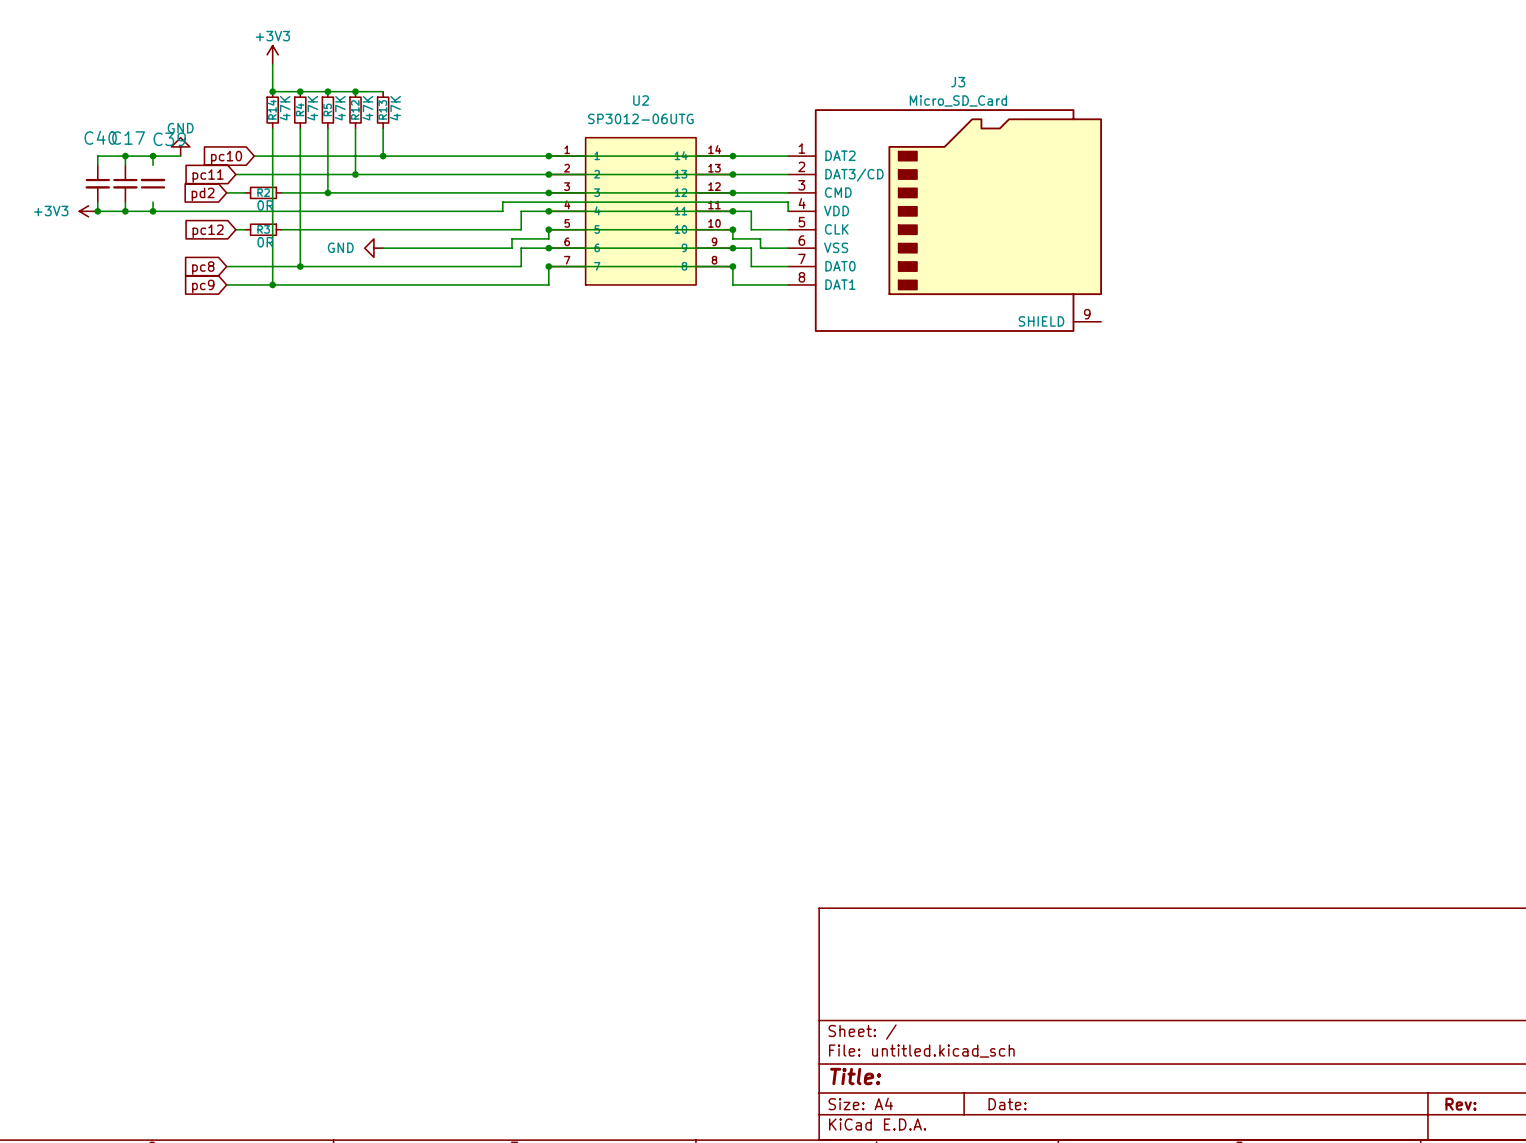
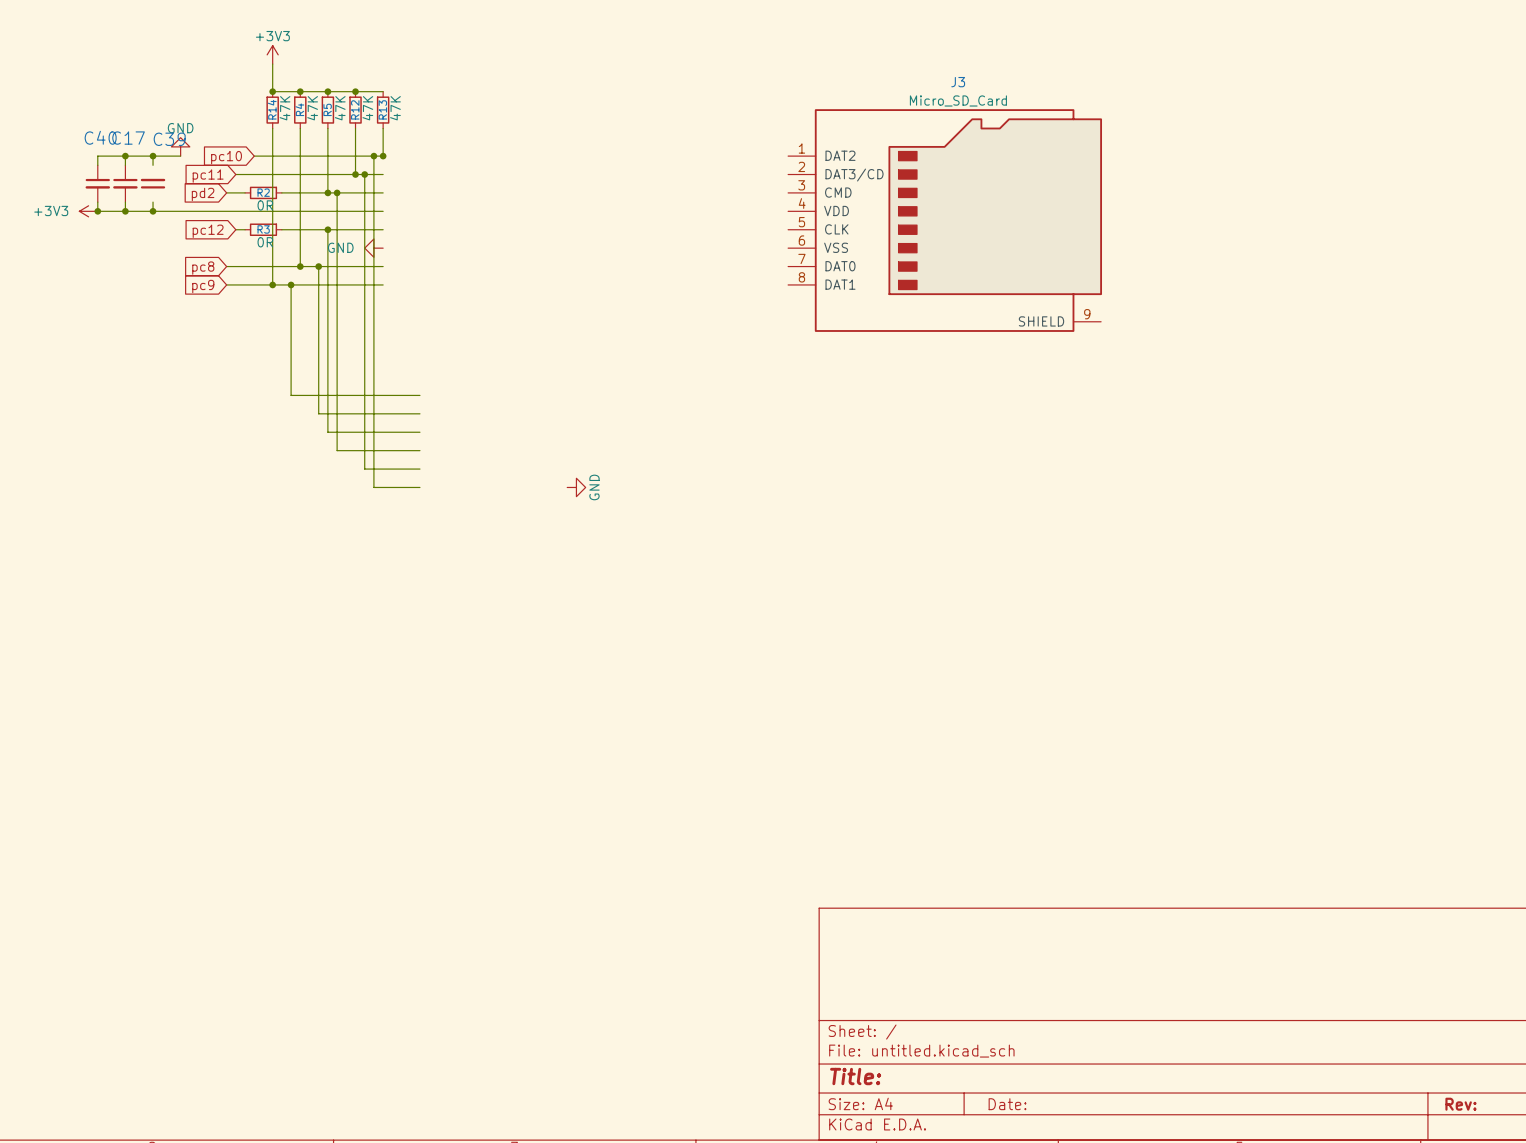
wire: none -> (373, 156) (373, 487) (419, 487)
junction: none -> (373, 156)
wire: (383, 156) (788, 156) -> none
junction: (548, 156) -> none
junction: (732, 156) -> none
wire: none -> (364, 174) (364, 469) (419, 469)
junction: none -> (364, 174)
wire: (383, 174) (788, 174) -> none
junction: (548, 174) -> none
junction: (732, 174) -> none
wire: none -> (337, 192) (337, 450) (419, 450)
junction: none -> (337, 192)
wire: (383, 192) (788, 192) -> none
junction: (548, 192) -> none
junction: (732, 192) -> none
wire: (383, 211) (502, 211) (502, 202) (788, 202) (788, 211) -> none
junction: (548, 211) -> none
U2: SP3012-06UTG (640, 211) -> none
junction: (732, 211) -> none
wire: none -> (327, 229) (327, 432) (419, 432)
junction: none -> (327, 229)
wire: (383, 229) (521, 229) (521, 211) (751, 211) (751, 229) (788, 229) -> none
junction: (548, 229) -> none
junction: (732, 229) -> none
wire: (383, 248) (511, 248) (511, 238) (548, 238) (548, 229) (732, 229) (732, 238) (760, 238) (760, 248) (788, 248) -> none
junction: (548, 248) -> none
junction: (732, 248) -> none
wire: none -> (318, 266) (318, 413) (419, 413)
junction: none -> (318, 266)
wire: (383, 266) (521, 266) (521, 248) (751, 248) (751, 266) (788, 266) -> none
junction: (548, 266) -> none
junction: (732, 266) -> none
wire: none -> (291, 284) (291, 395) (419, 395)
junction: none -> (291, 284)
wire: (383, 284) (548, 284) (548, 266) (732, 266) (732, 284) (788, 284) -> none
power symbol: none -> GND (576, 487)

